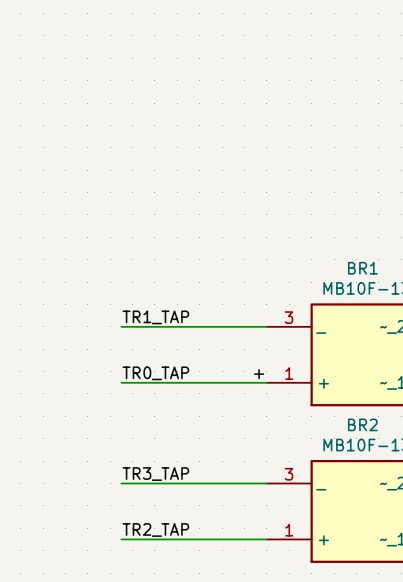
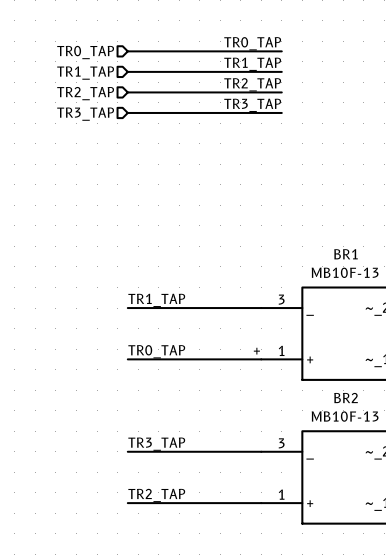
label: none -> TR0_TAP (252, 43)
hierarchical label: none -> TR0_TAP (85, 52)
wire: none -> (127, 51) (281, 51)
label: none -> TR1_TAP (252, 64)
hierarchical label: none -> TR1_TAP (85, 73)
wire: none -> (127, 71) (281, 71)
label: none -> TR2_TAP (252, 84)
wire: none -> (127, 92) (281, 92)
hierarchical label: none -> TR2_TAP (85, 93)
label: none -> TR3_TAP (252, 105)
hierarchical label: none -> TR3_TAP (85, 114)
wire: none -> (127, 112) (281, 112)

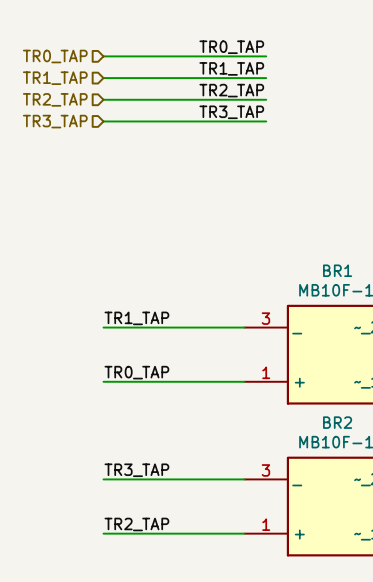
label: + (256, 351) -> none

